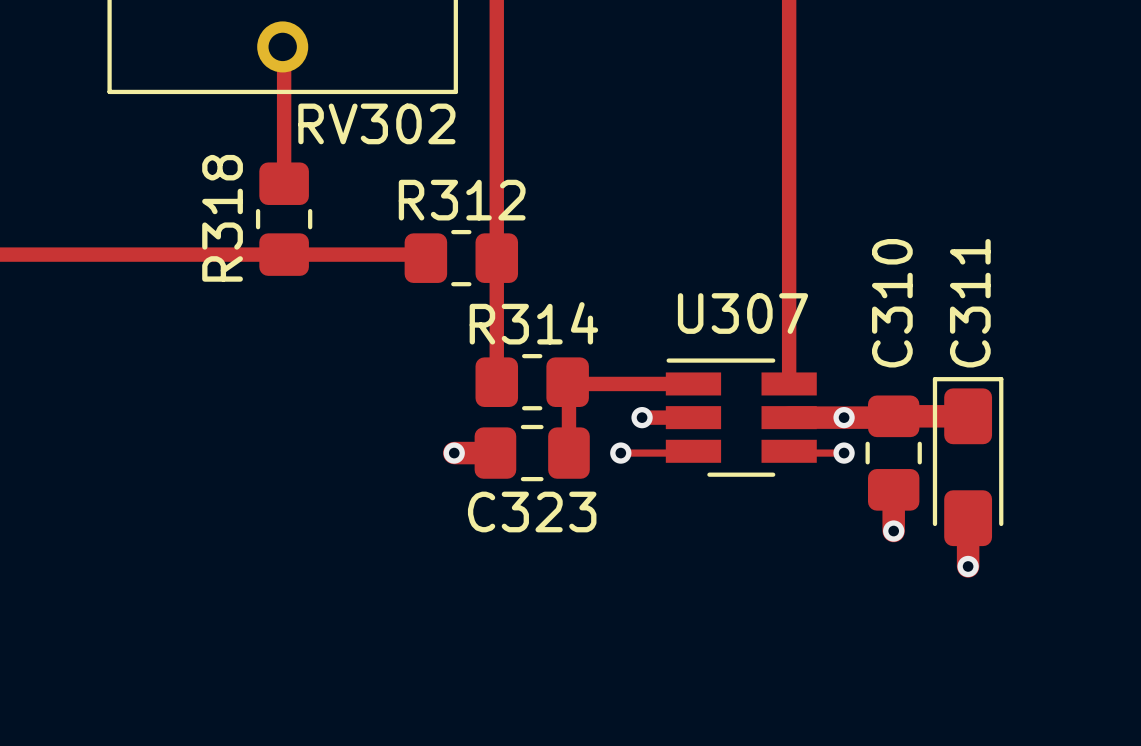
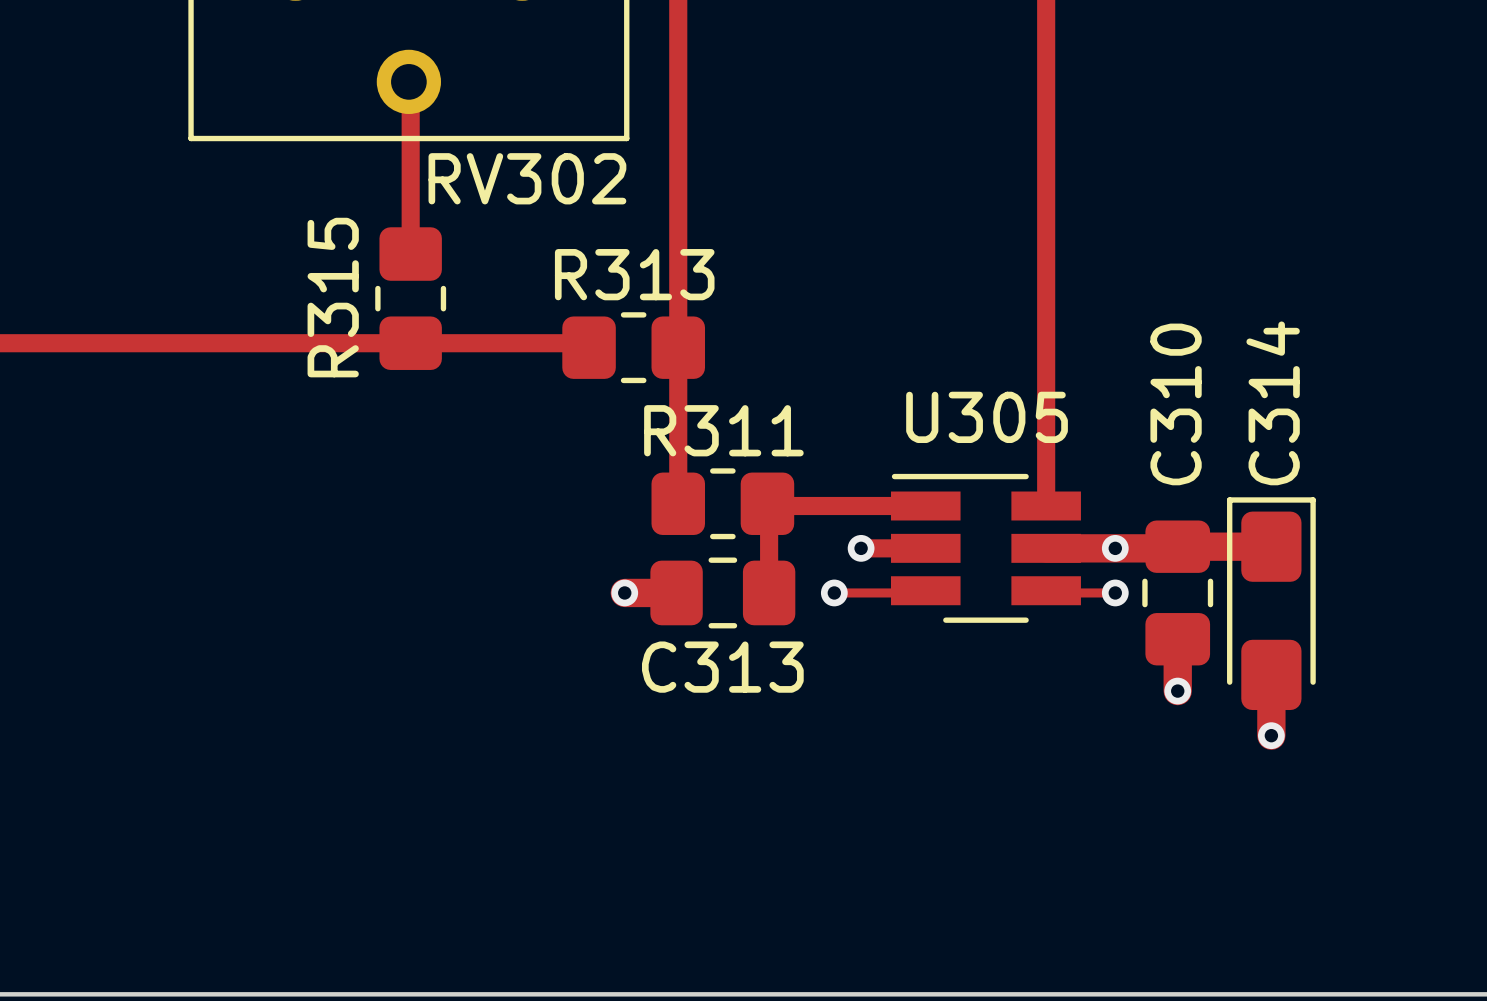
R312 name: R312 (462, 200) -> R313 (634, 274)
R318 name: R318 (222, 218) -> R315 (333, 297)
C311 name: C311 (970, 303) -> C314 (1273, 403)
U307 name: U307 (742, 313) -> U305 (987, 417)
R314 name: R314 (533, 323) -> R311 (723, 430)
C323 name: C323 (532, 511) -> C313 (722, 667)

